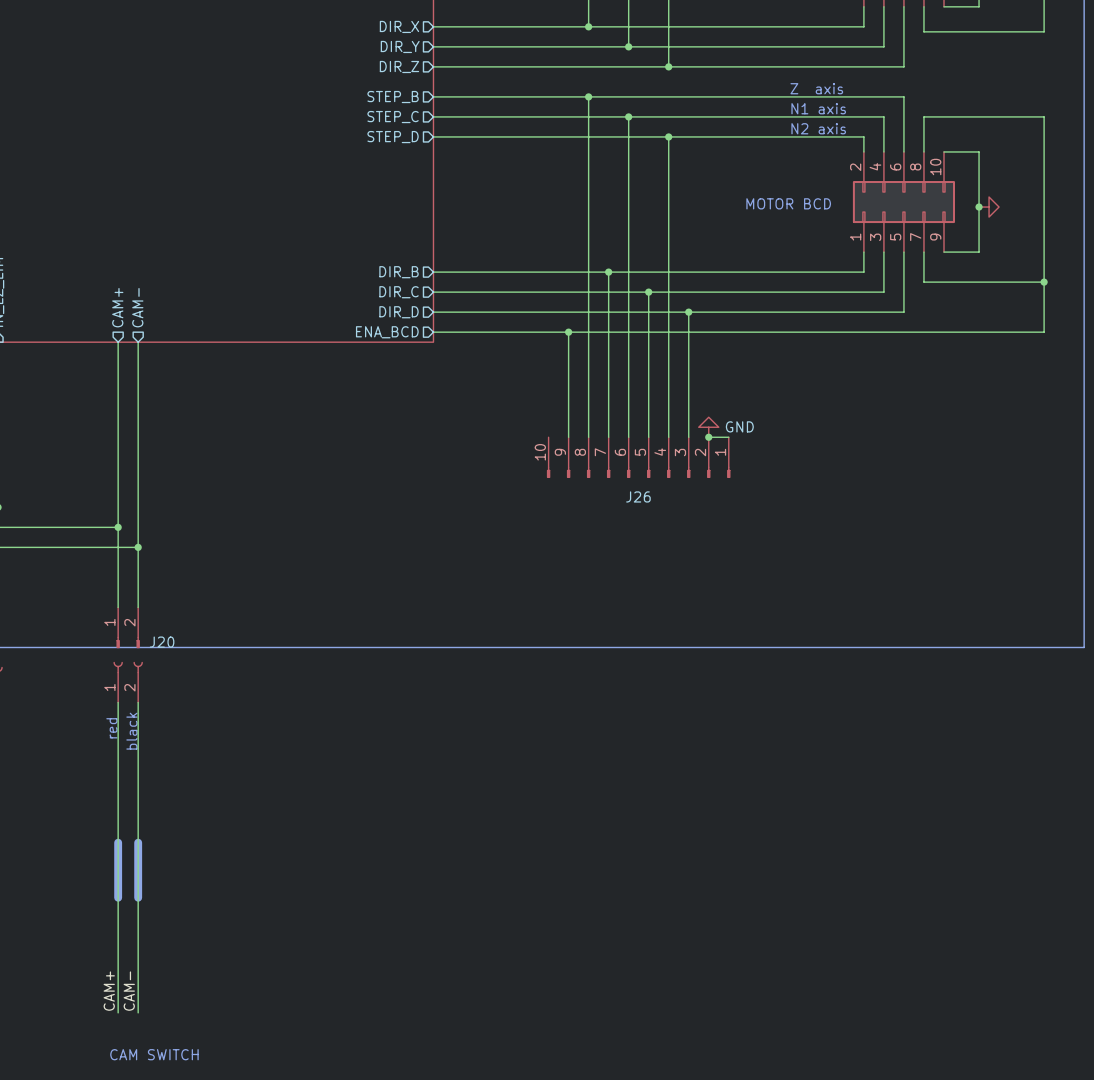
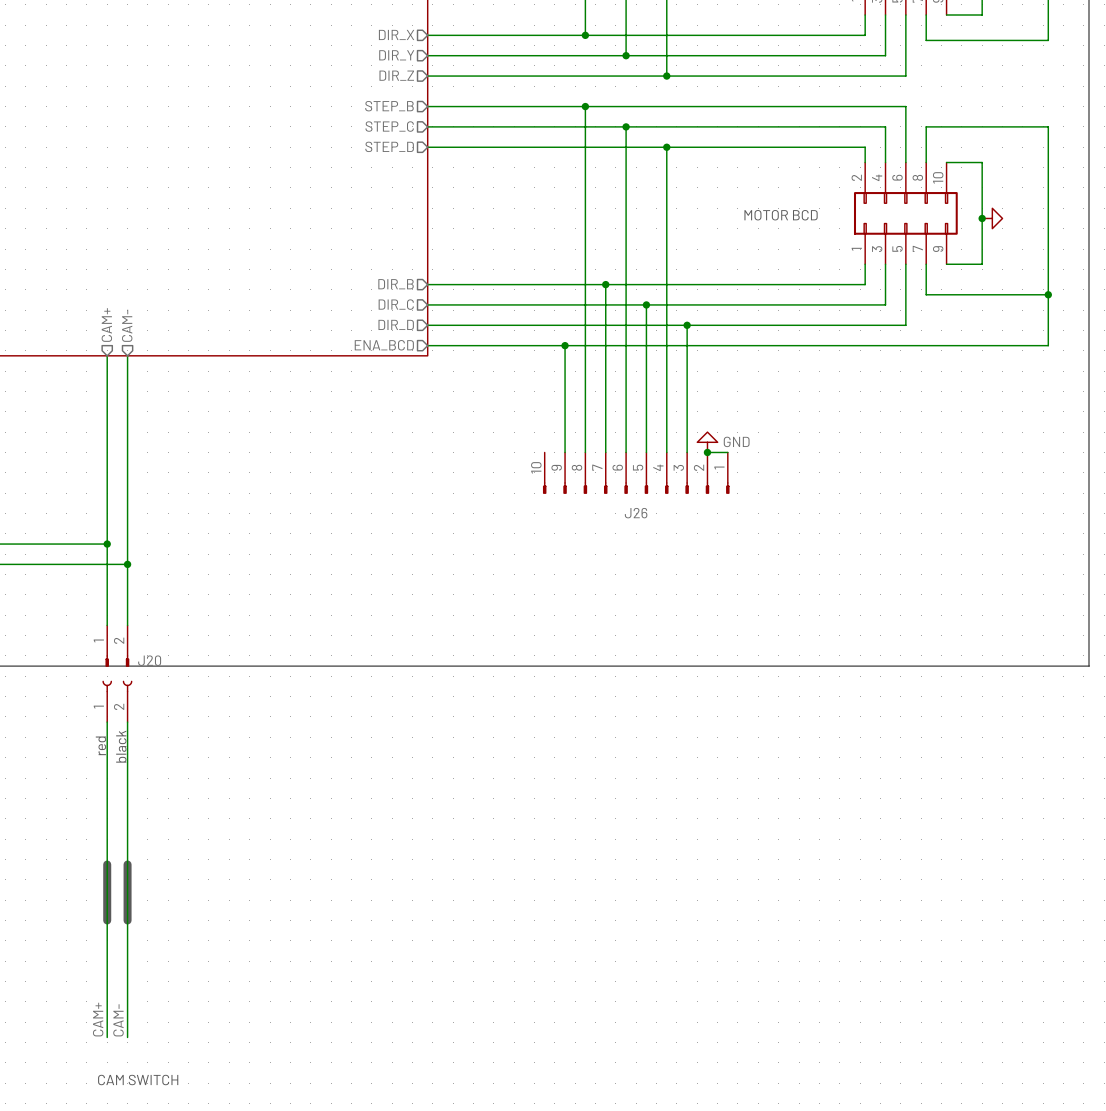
text: Z axis (816, 88) -> none
text: N1 axis (818, 108) -> none
text: N2 axis (818, 128) -> none

